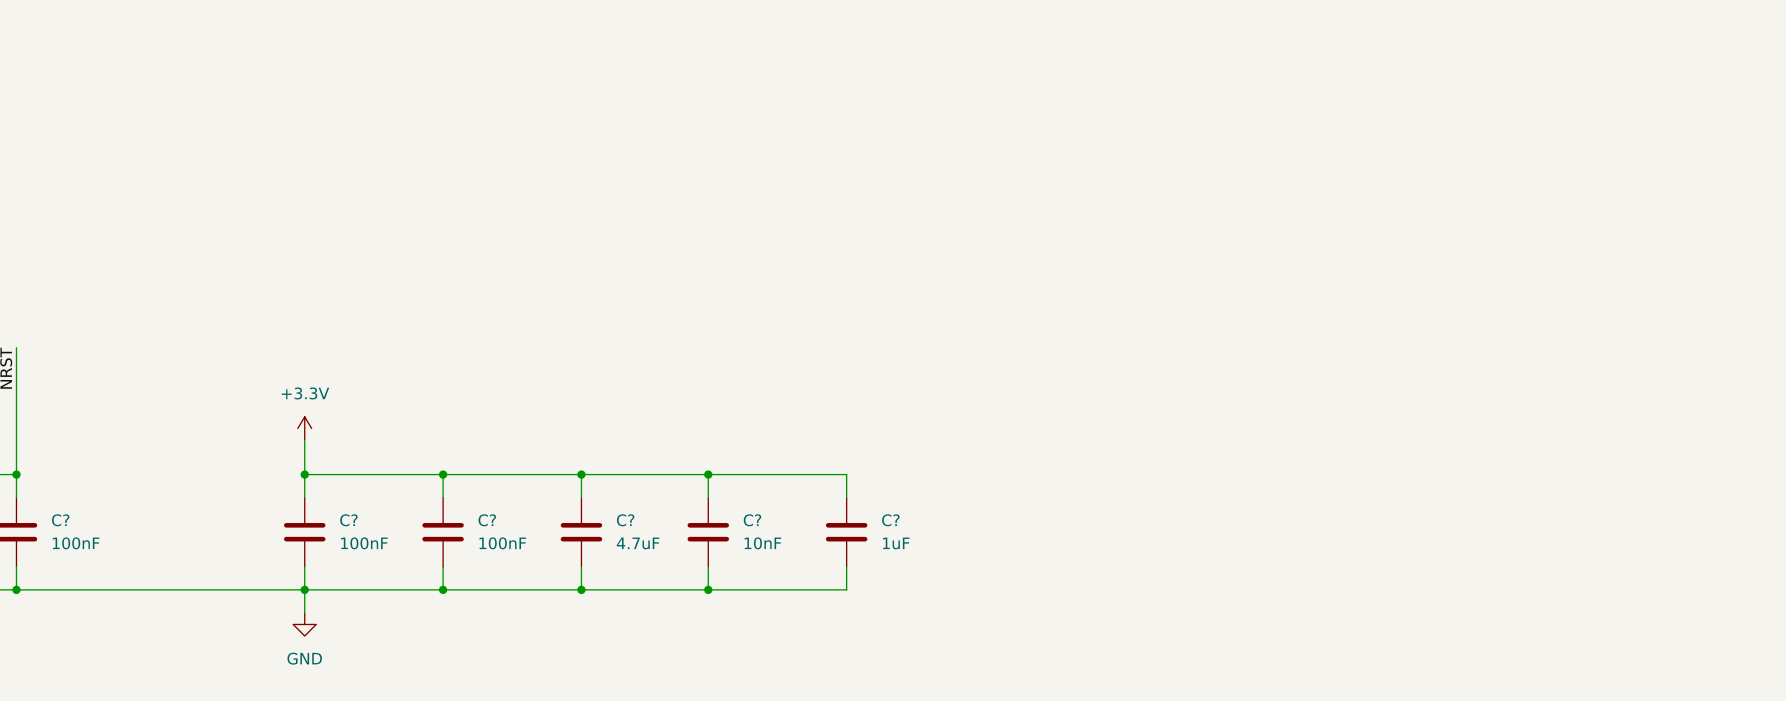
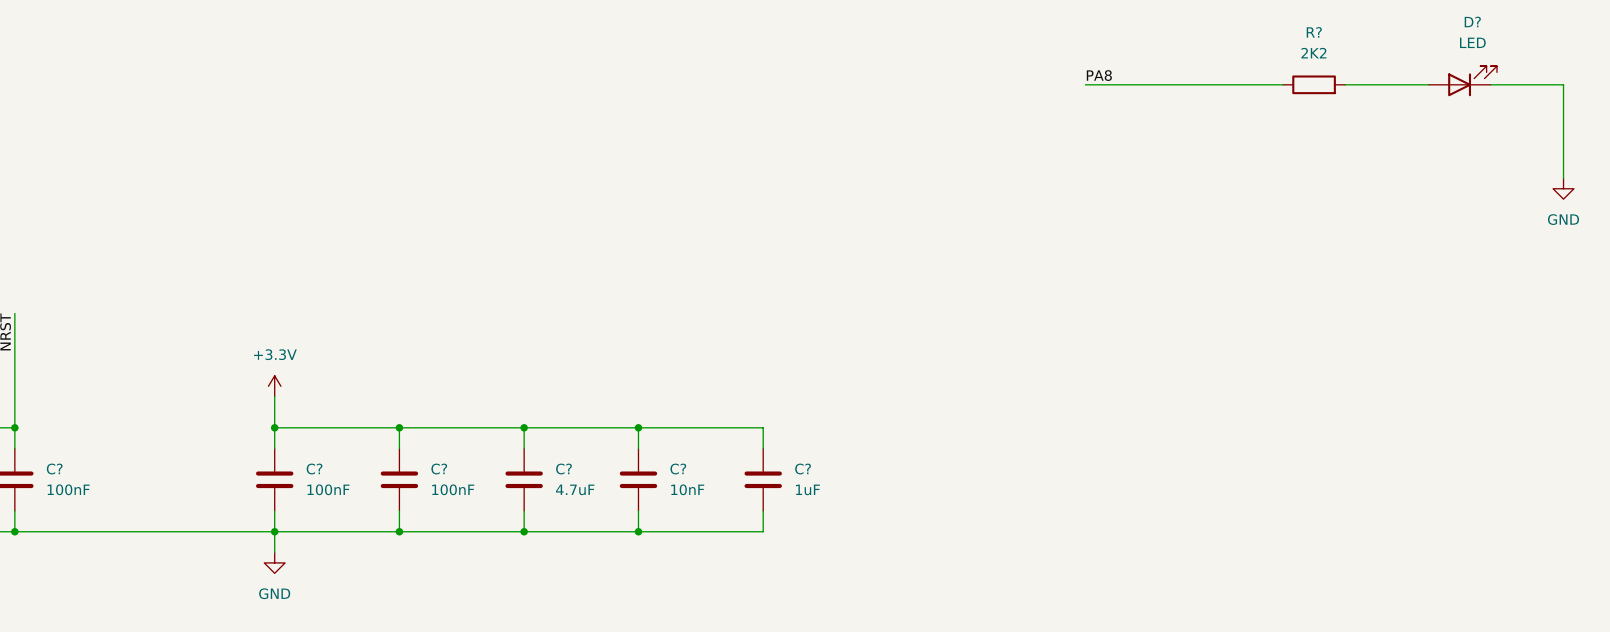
label: none -> PA8 (1099, 75)
D?: none -> LED (1462, 81)
wire: none -> (1085, 84) (1282, 84)
R?: none -> 2K2 (1314, 84)
wire: none -> (1345, 84) (1428, 84)
wire: none -> (1490, 84) (1563, 84) (1563, 178)
power symbol: none -> GND (1563, 188)

